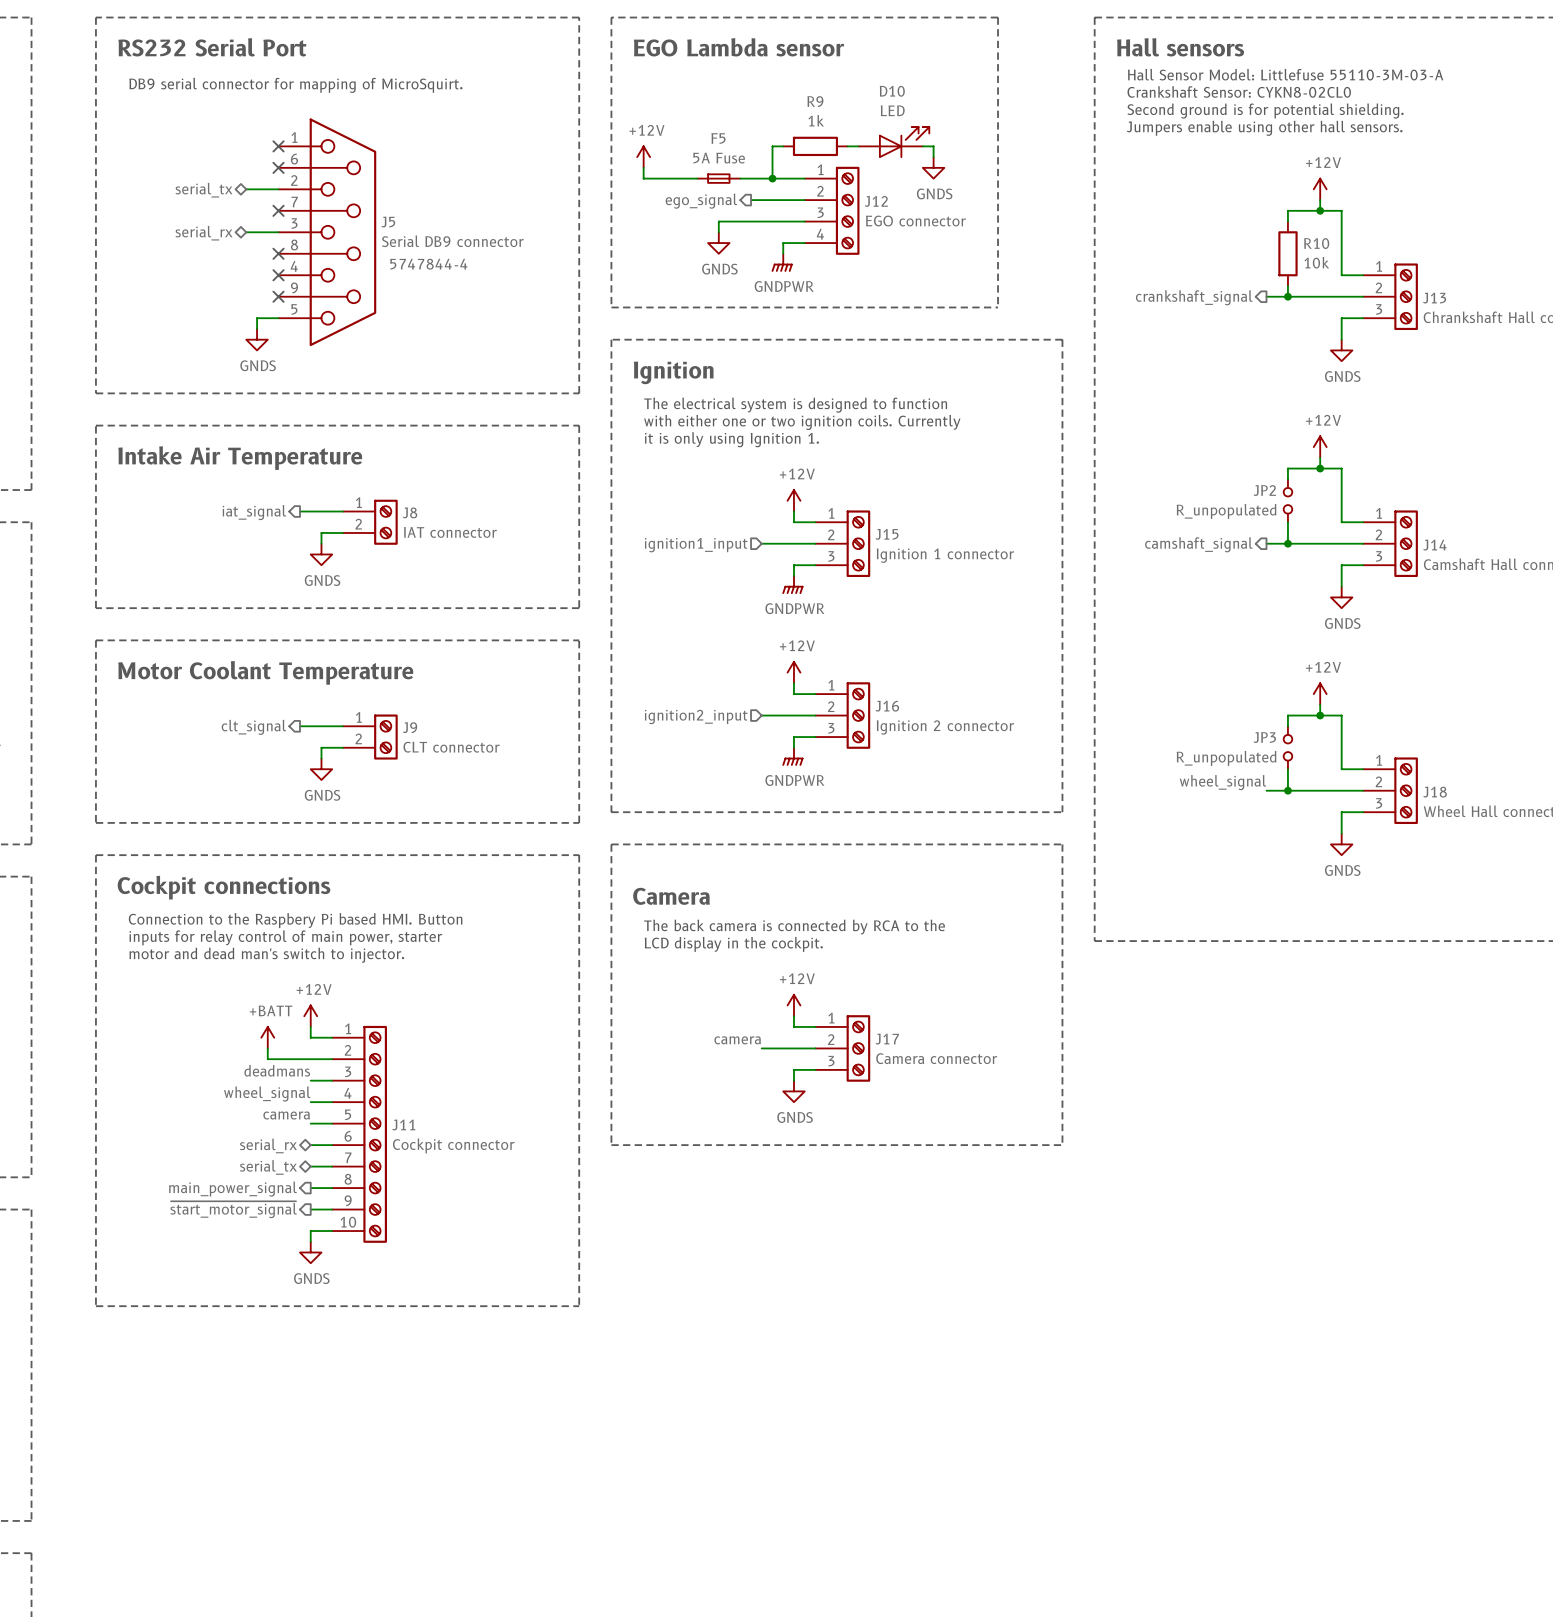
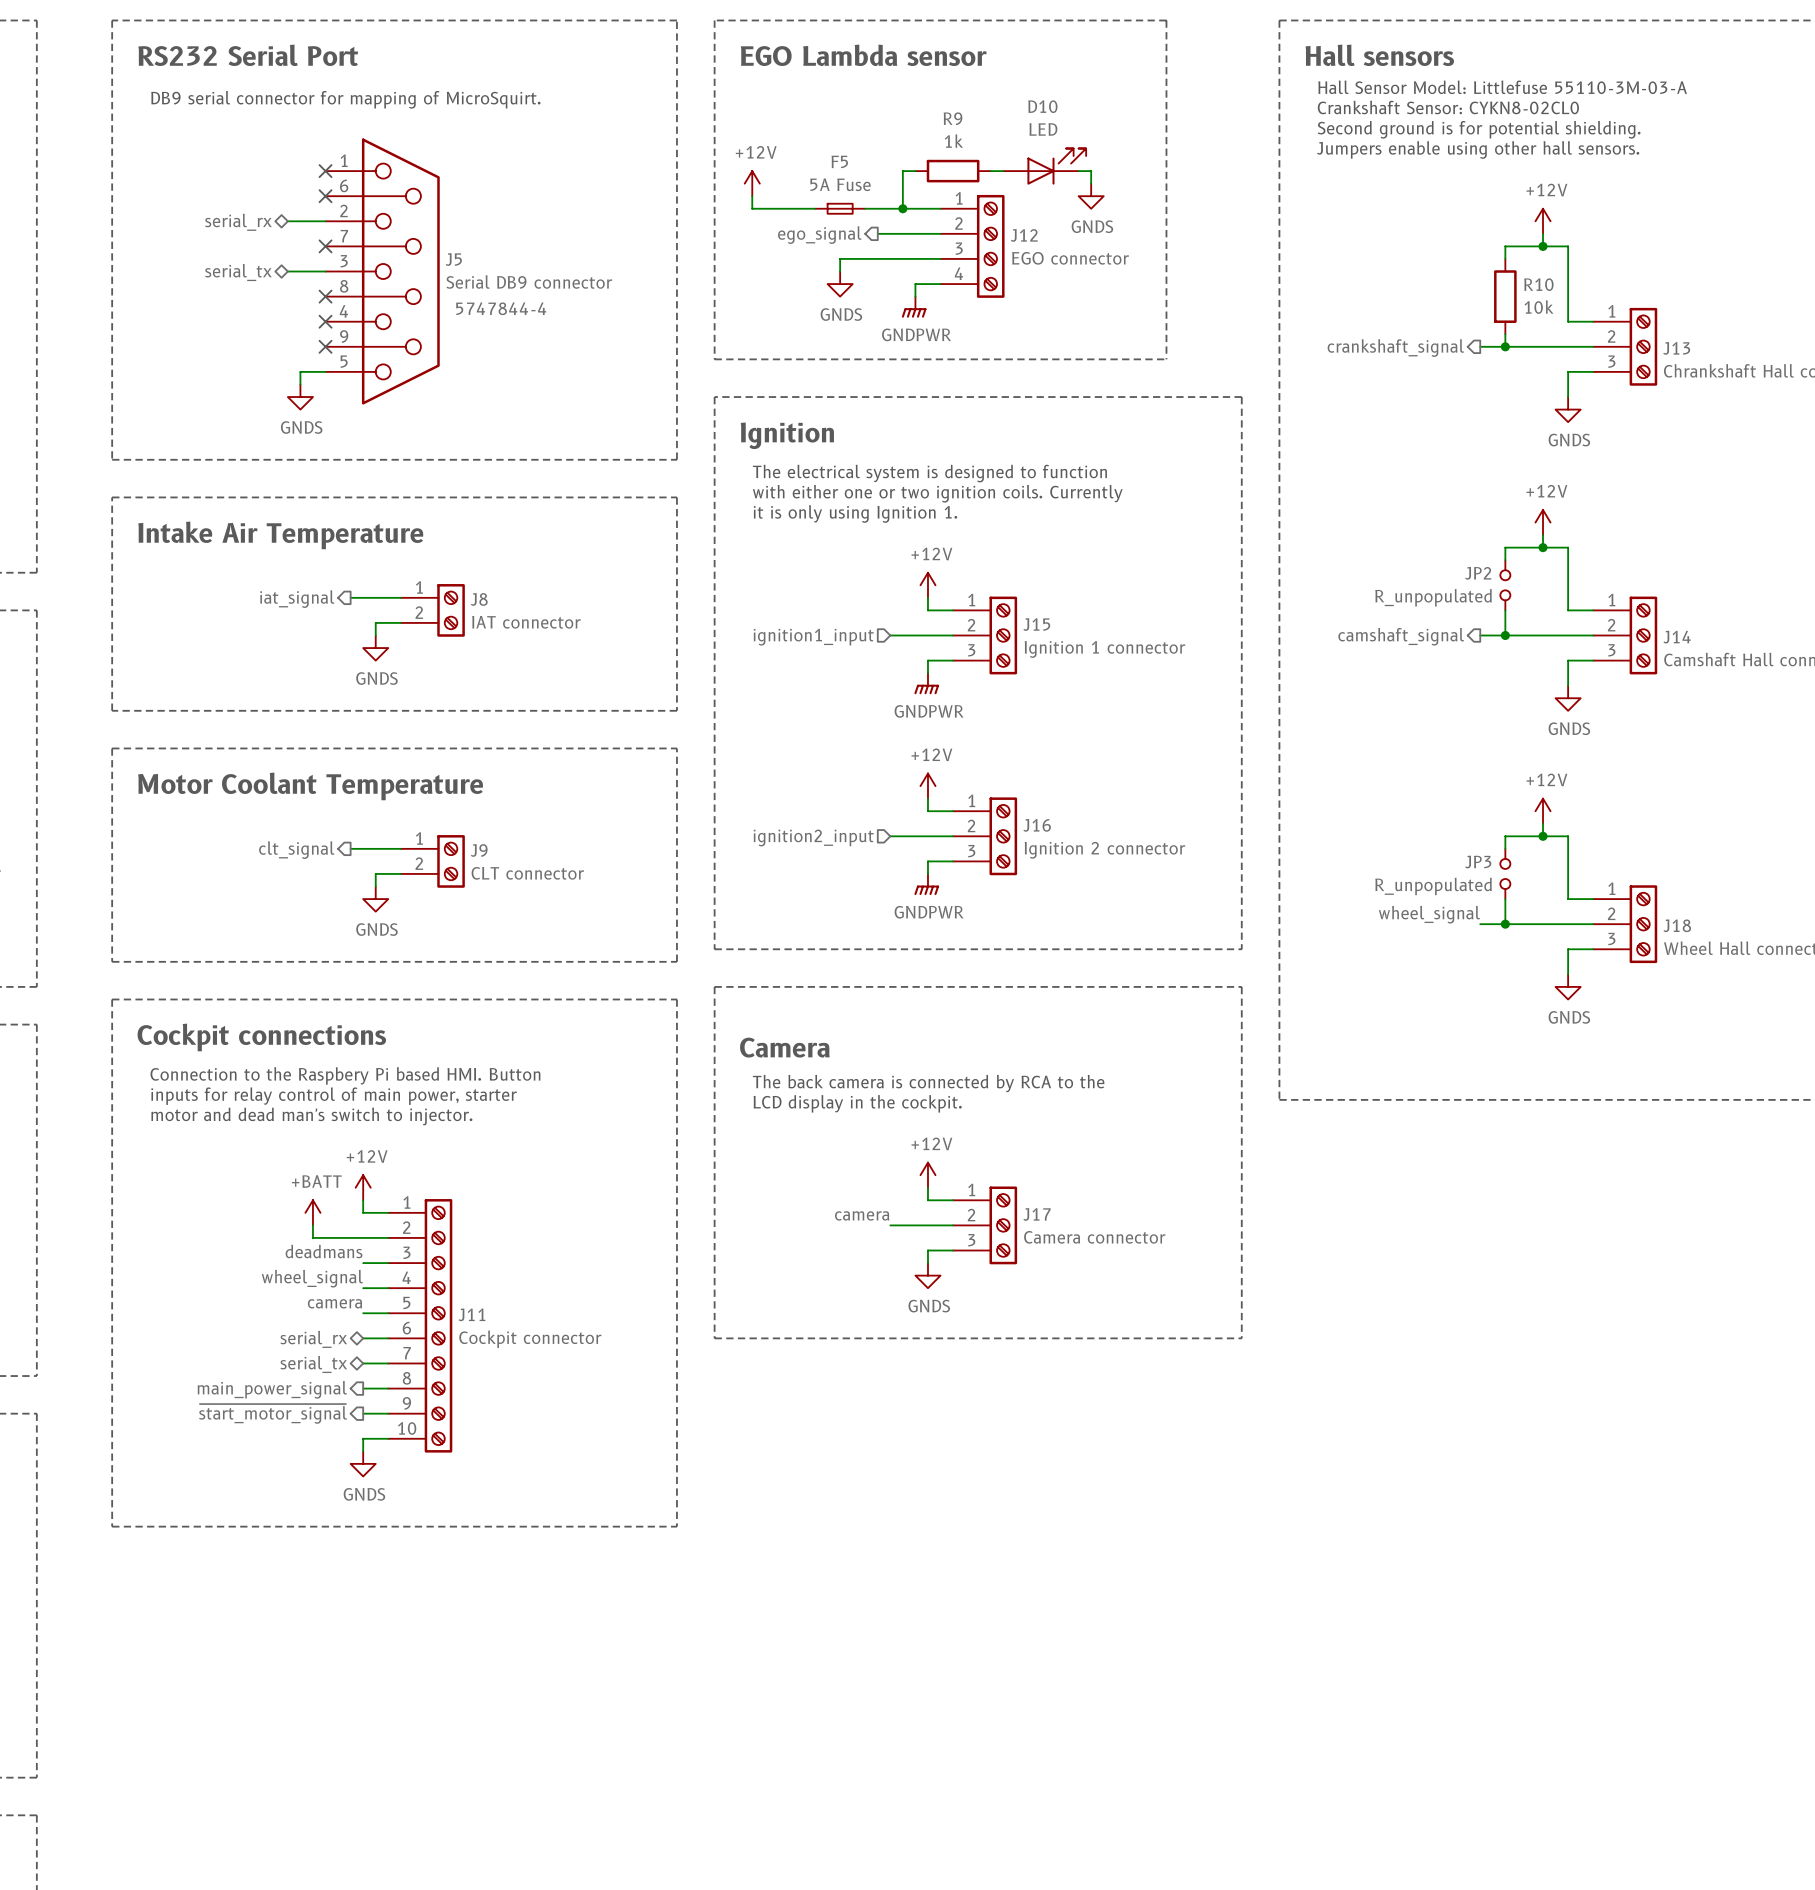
hierarchical label: serial_tx (204, 190) -> serial_rx (238, 222)
hierarchical label: serial_rx (204, 233) -> serial_tx (238, 272)

